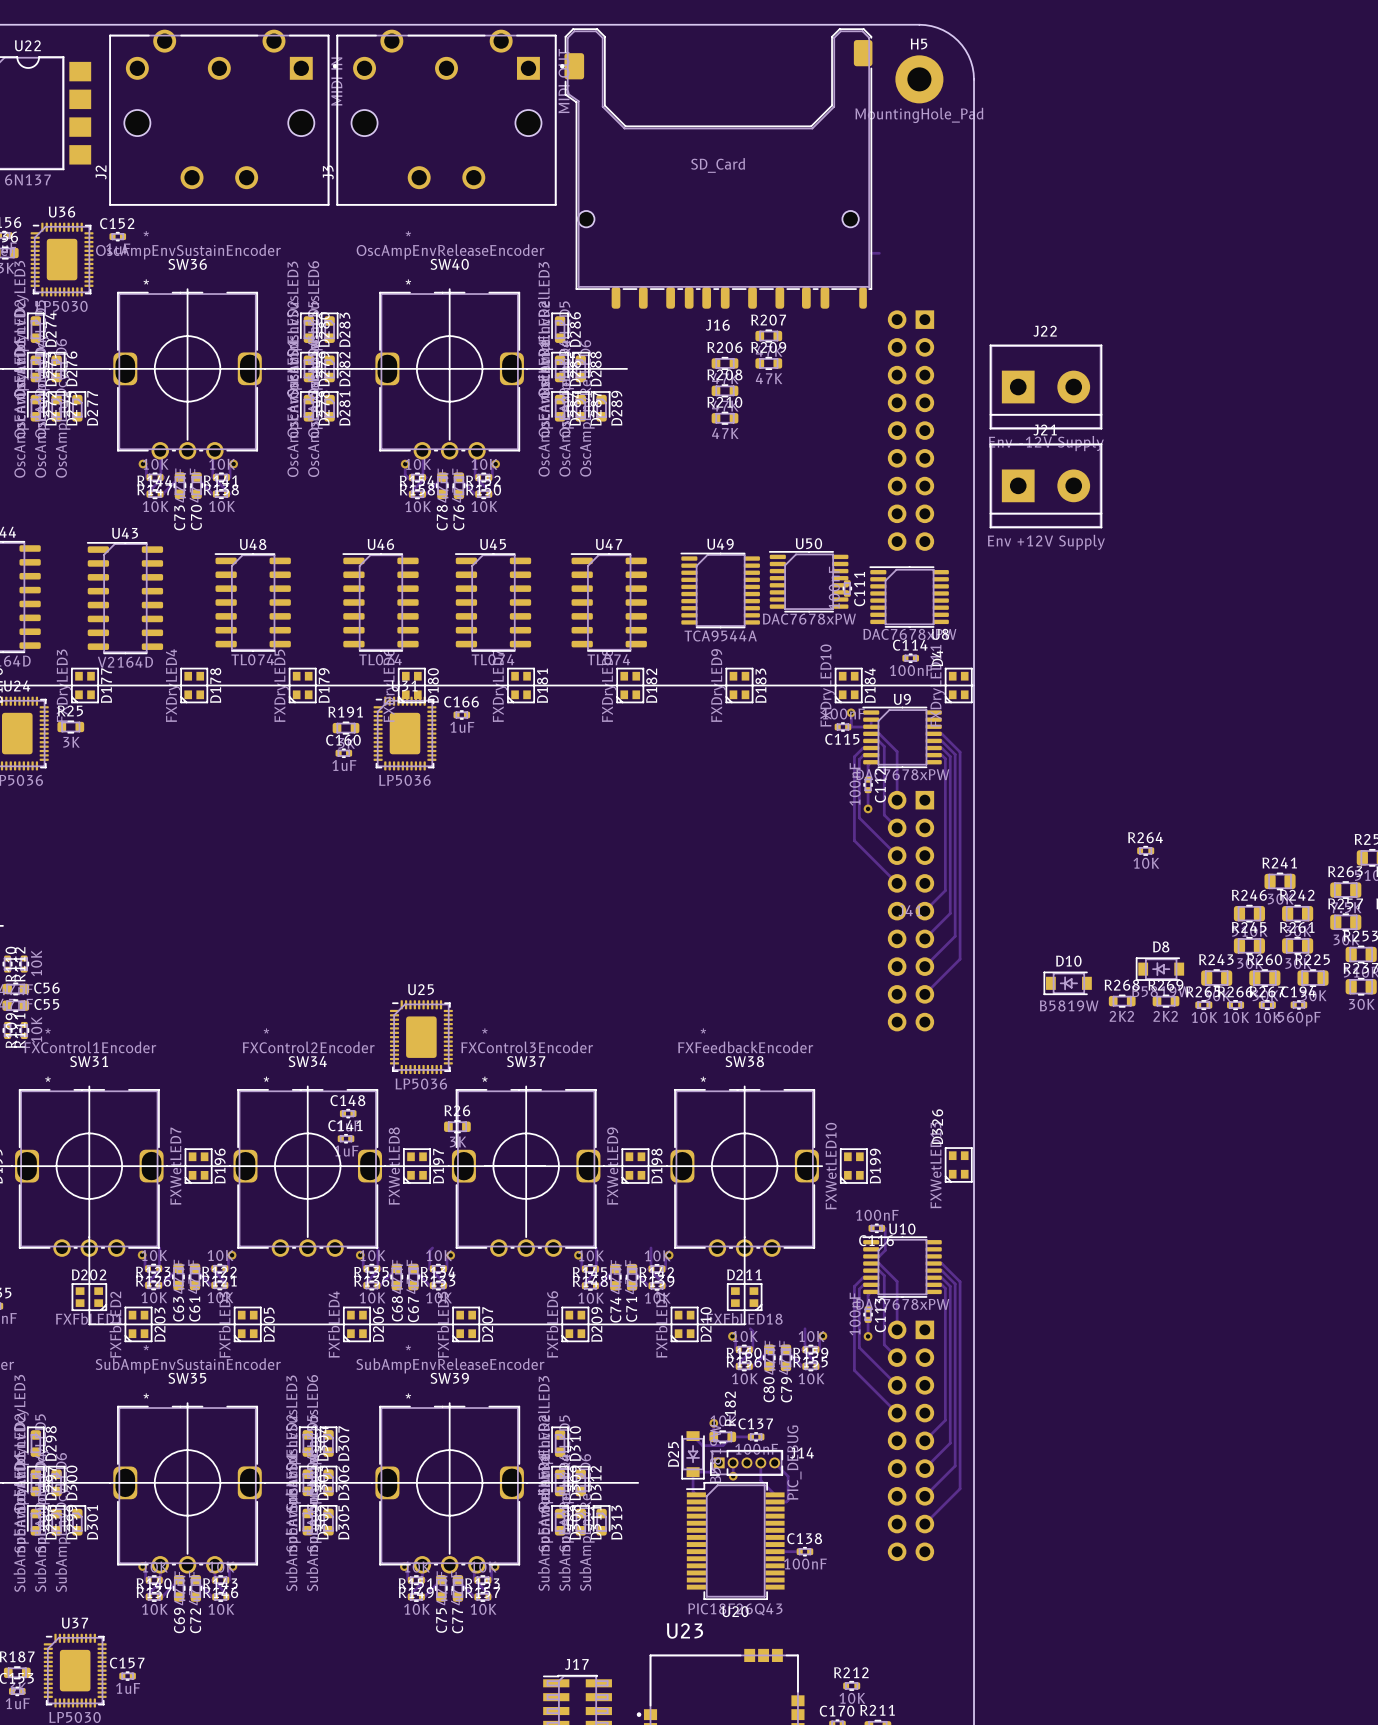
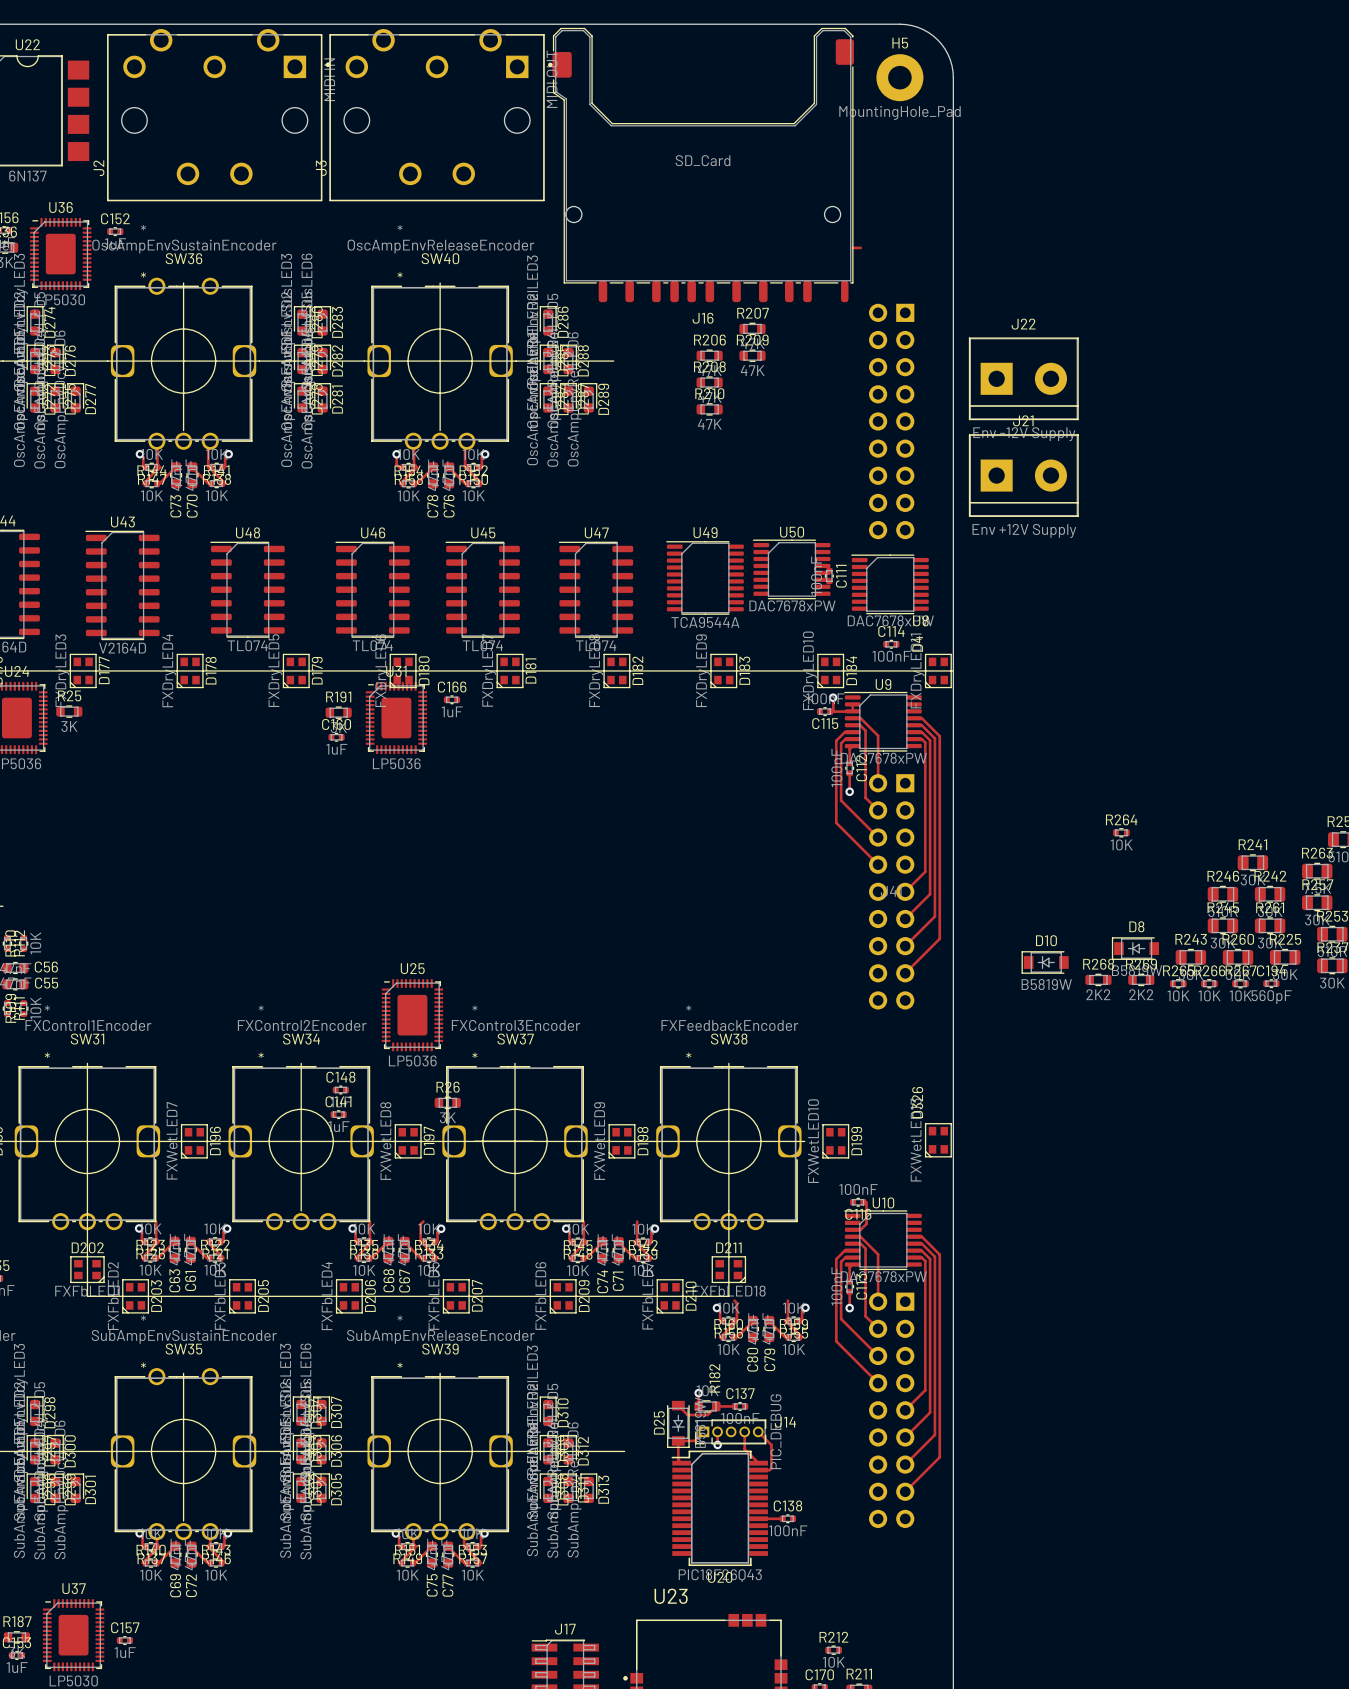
SW36 footprint: [109, 288, 266, 460] -> [107, 277, 261, 450]
SW35 footprint: [109, 1402, 266, 1574] -> [107, 1368, 261, 1541]

